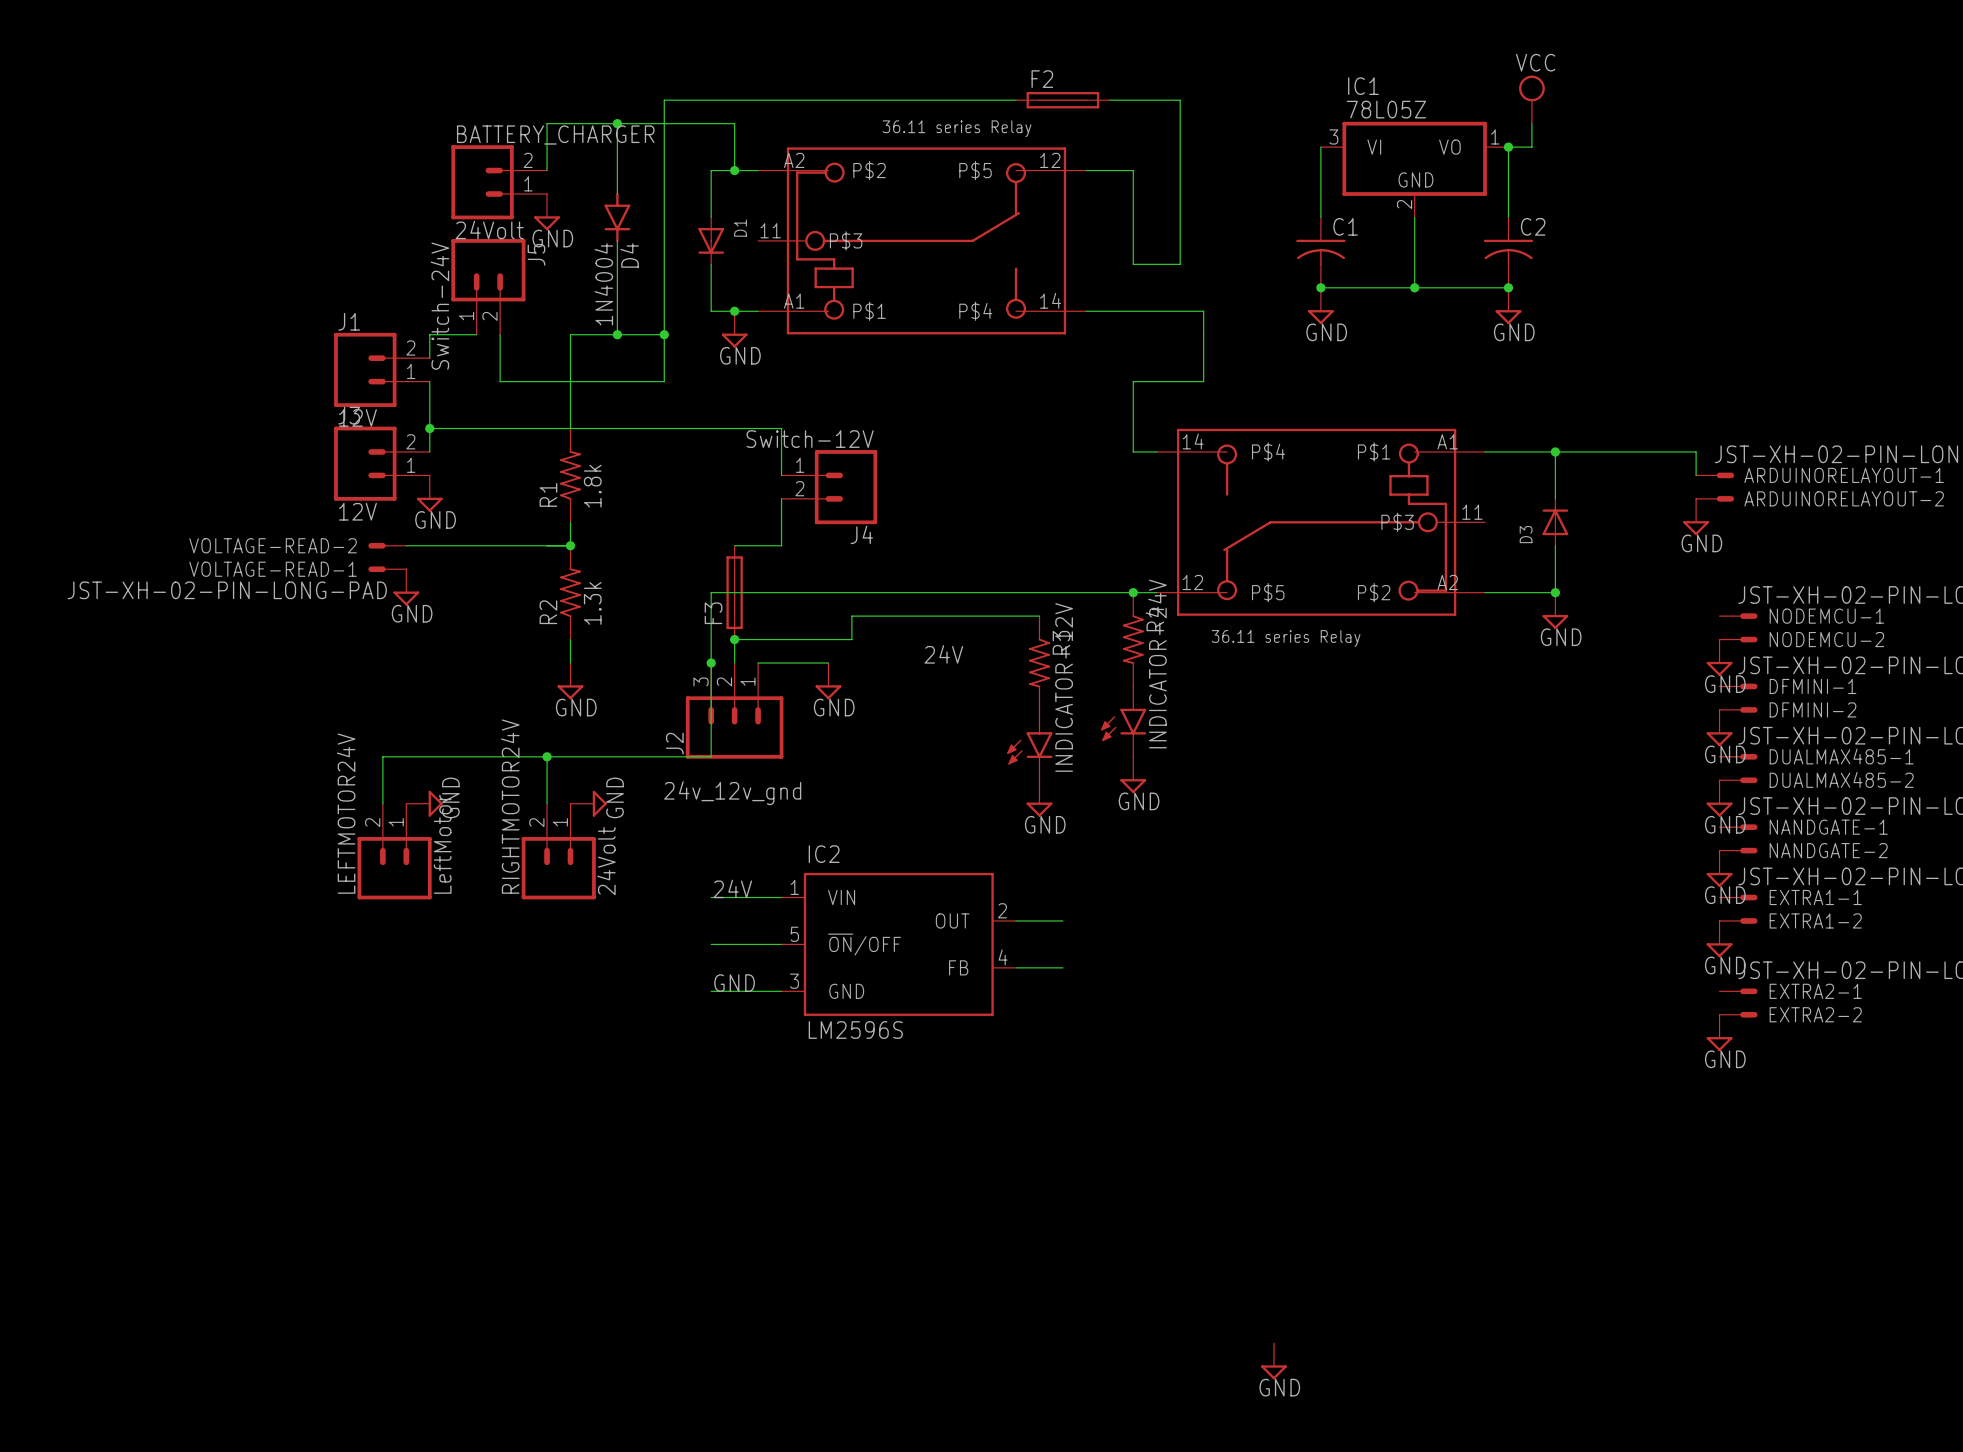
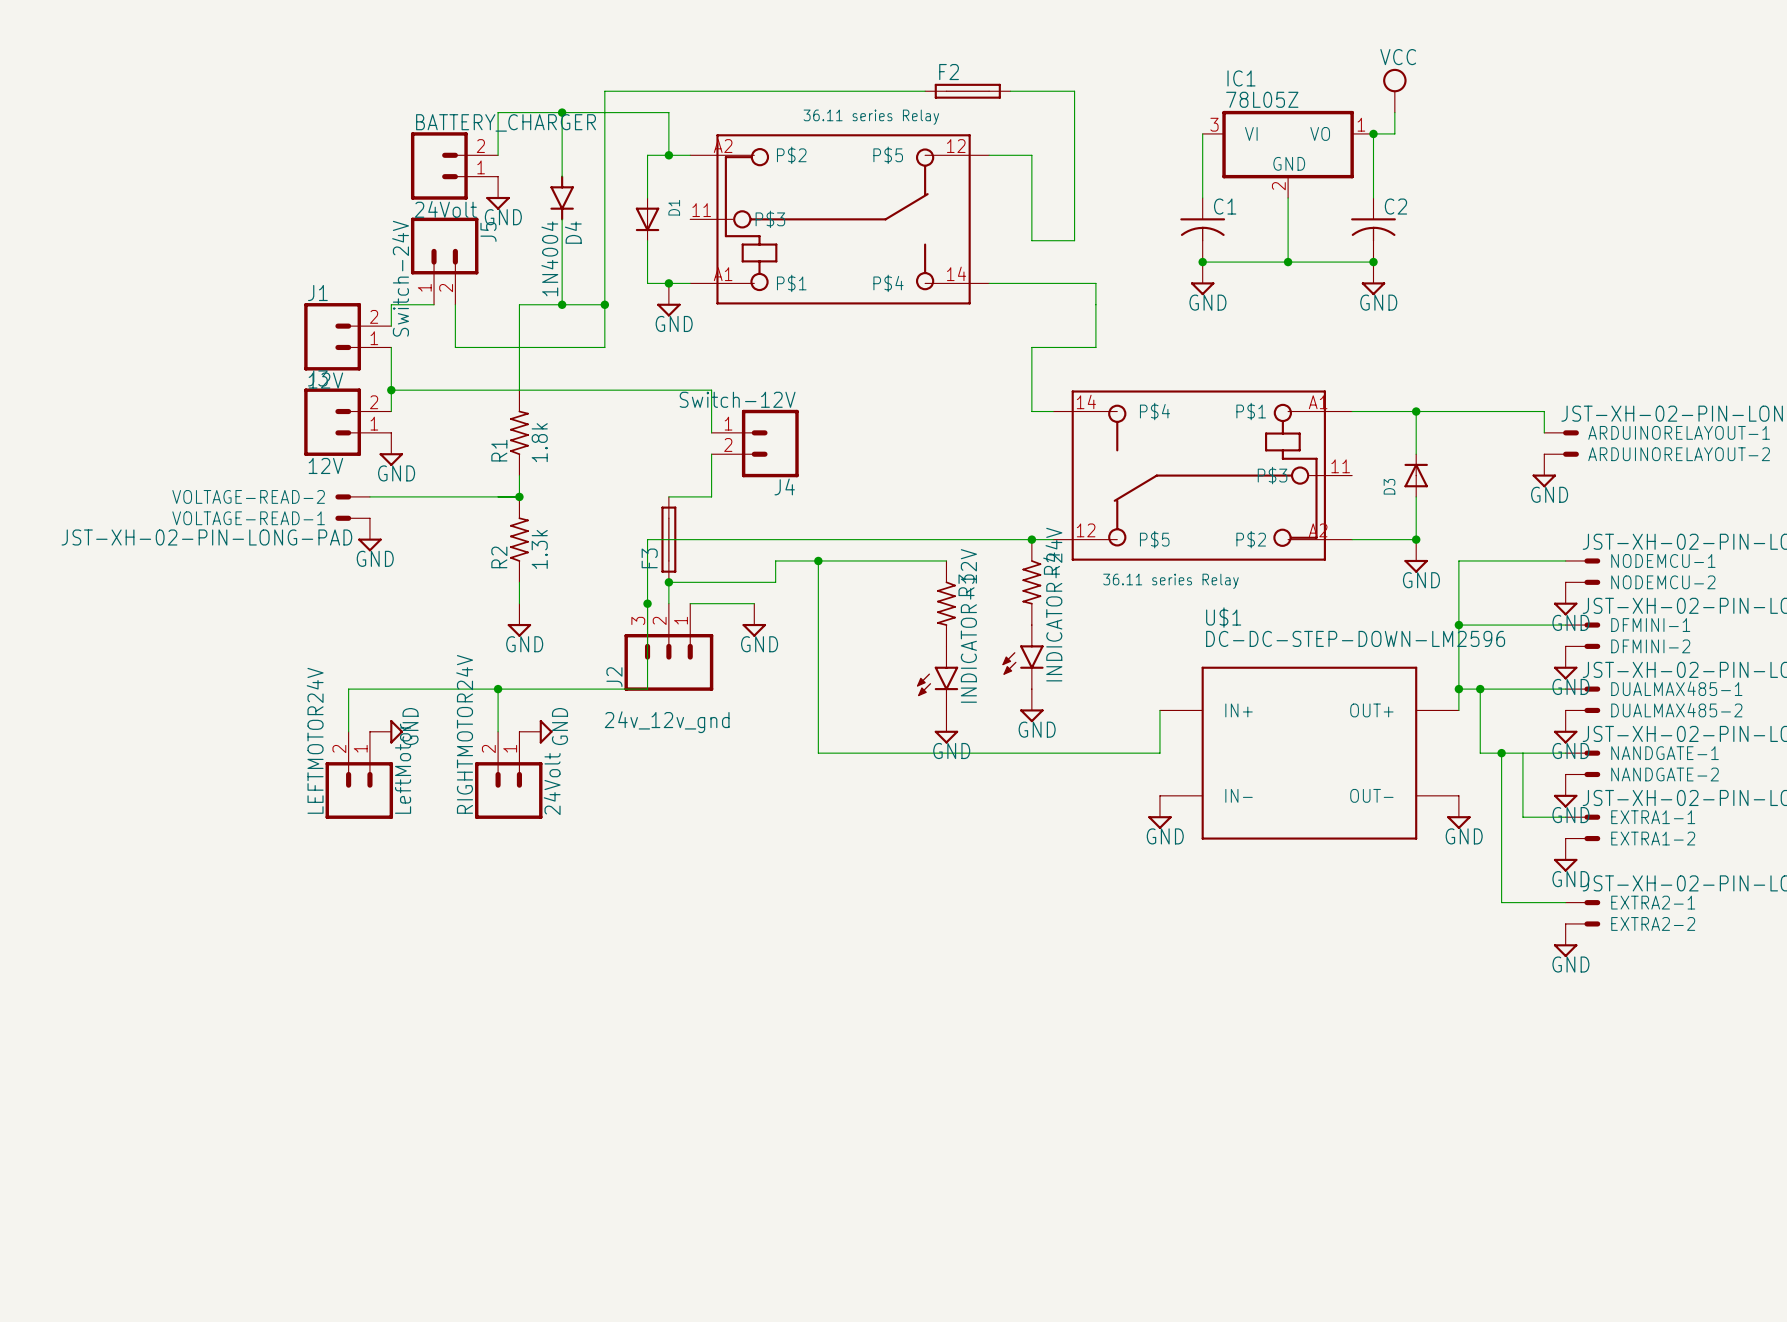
wire: none -> (818, 560) (818, 753) (1159, 753) (1159, 710)
junction: none -> (818, 560)
wire: none -> (1565, 560) (1458, 560) (1458, 710)
label: 24V (943, 654) -> none
wire: none -> (1458, 625) (1565, 625)
junction: none -> (1458, 625)
wire: none -> (1458, 689) (1565, 689)
junction: none -> (1458, 689)
wire: none -> (1480, 689) (1480, 753) (1565, 753)
junction: none -> (1480, 689)
U$1: none -> DC-DC-STEP-DOWN-LM2596 (1309, 753)
wire: none -> (1501, 753) (1501, 902) (1565, 902)
junction: none -> (1501, 753)
wire: none -> (1522, 753) (1522, 817) (1565, 817)
label: 24V (732, 888) -> none
power symbol: none -> GND (1159, 812)
power symbol: none -> GND (1458, 812)
wire: (711, 897) (781, 897) -> none
wire: (1016, 920) (1062, 920) -> none
wire: (711, 944) (781, 944) -> none
IC2: LM2596S (898, 944) -> none
wire: (1016, 967) (1062, 967) -> none
label: GND (734, 983) -> none
wire: (711, 991) (781, 991) -> none
power symbol: GND (1273, 1361) -> none

